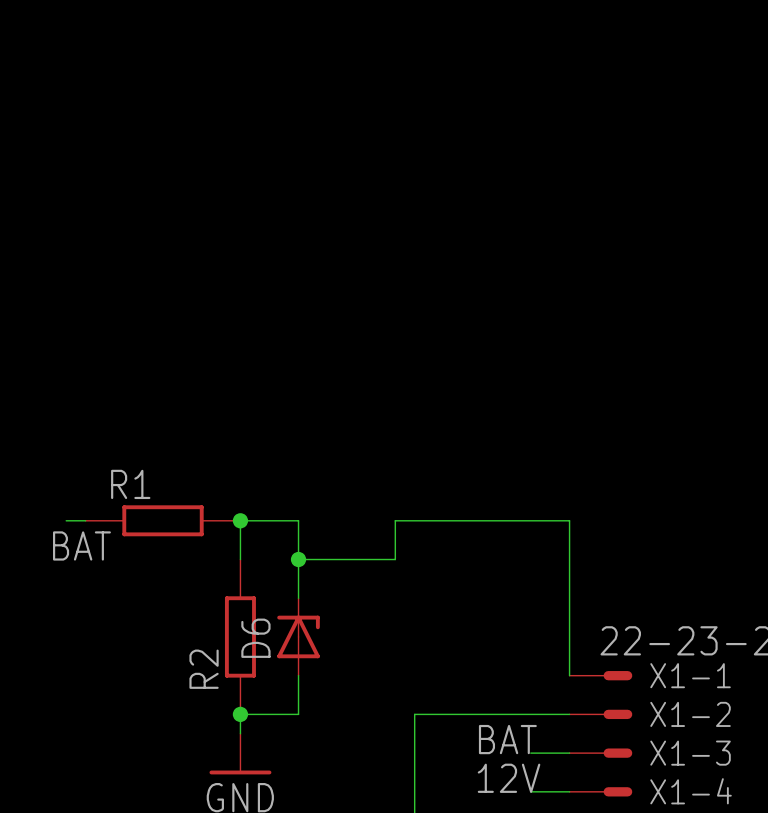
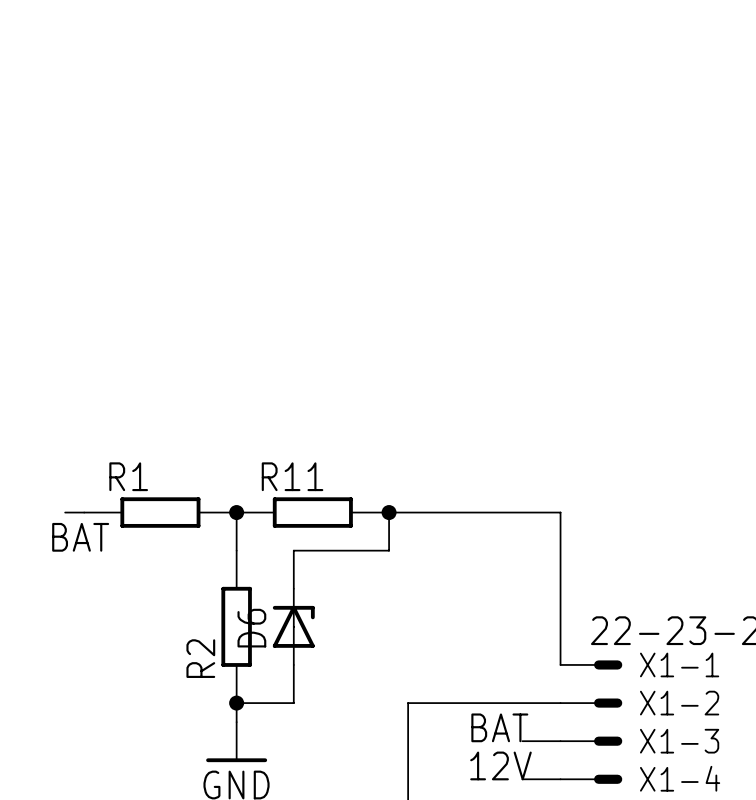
wire: (240, 520) (298, 520) (298, 559) -> none
R11: none -> (312, 512)
junction: none -> (389, 512)
junction: (298, 559) -> none

